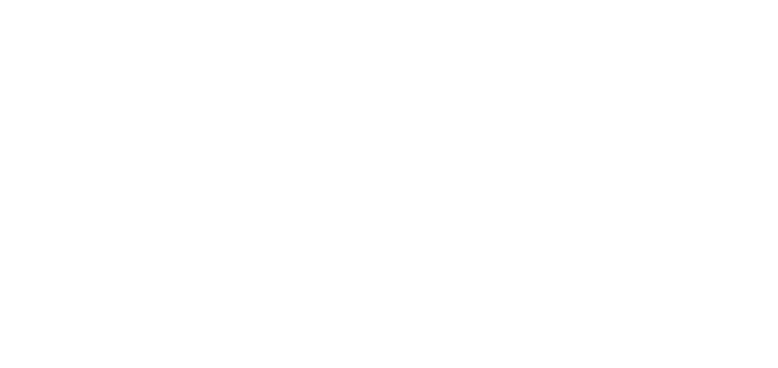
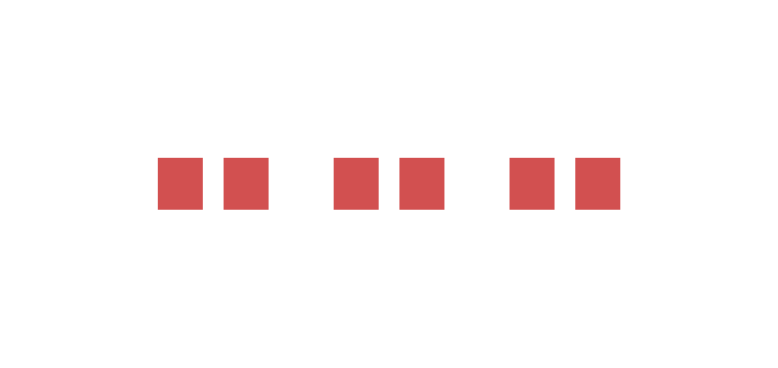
part: none -> (213, 183)
part: none -> (389, 183)
part: none -> (564, 183)

